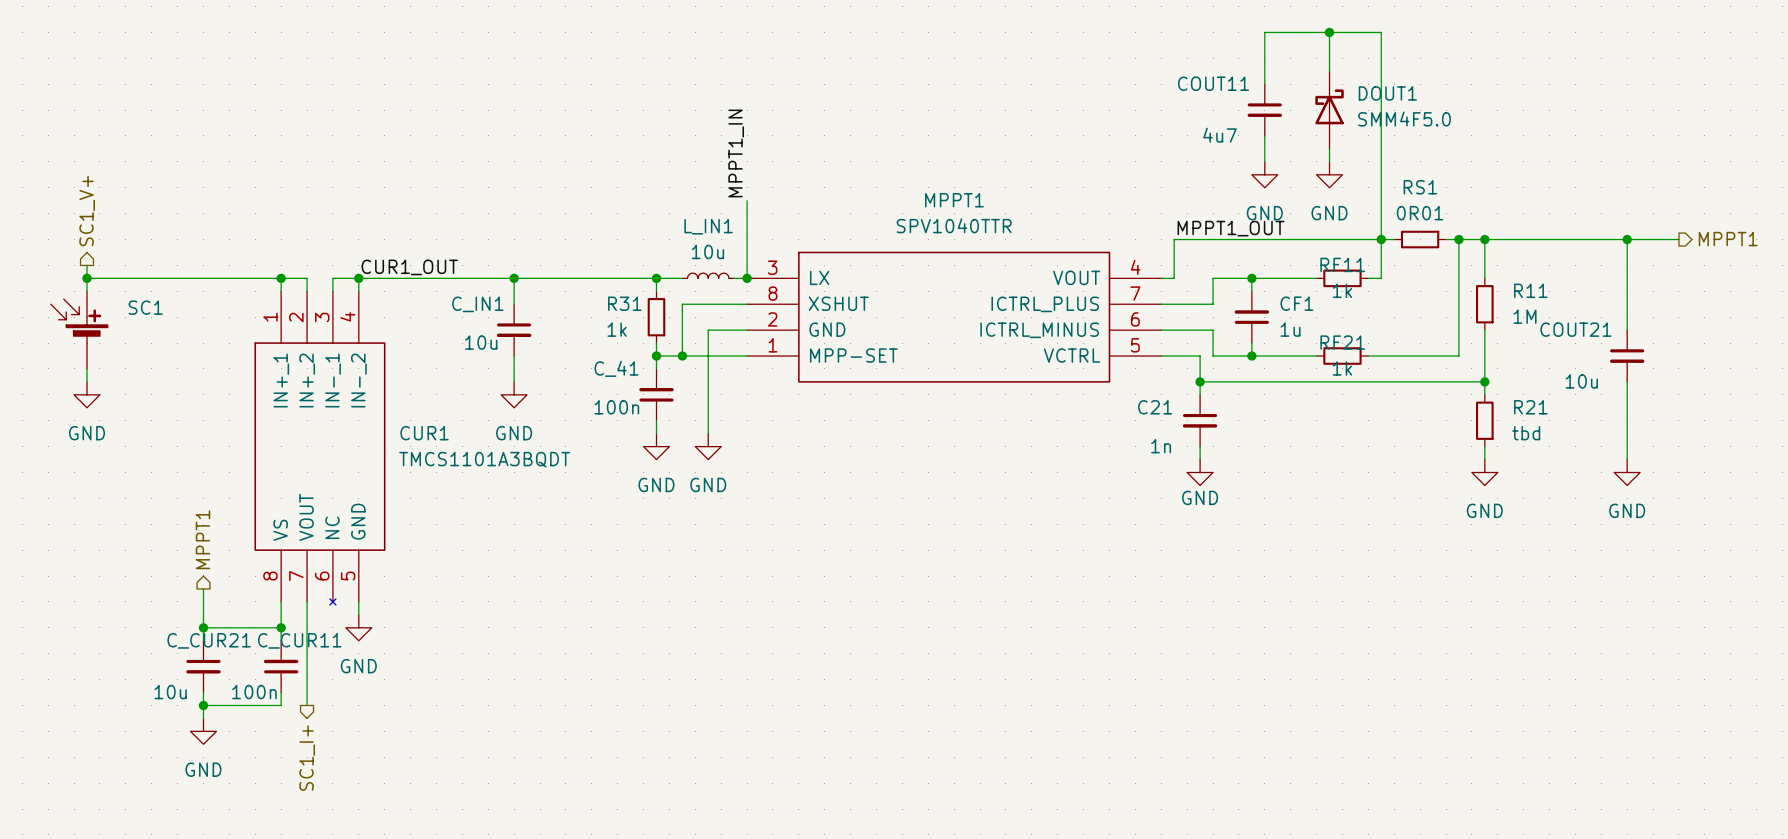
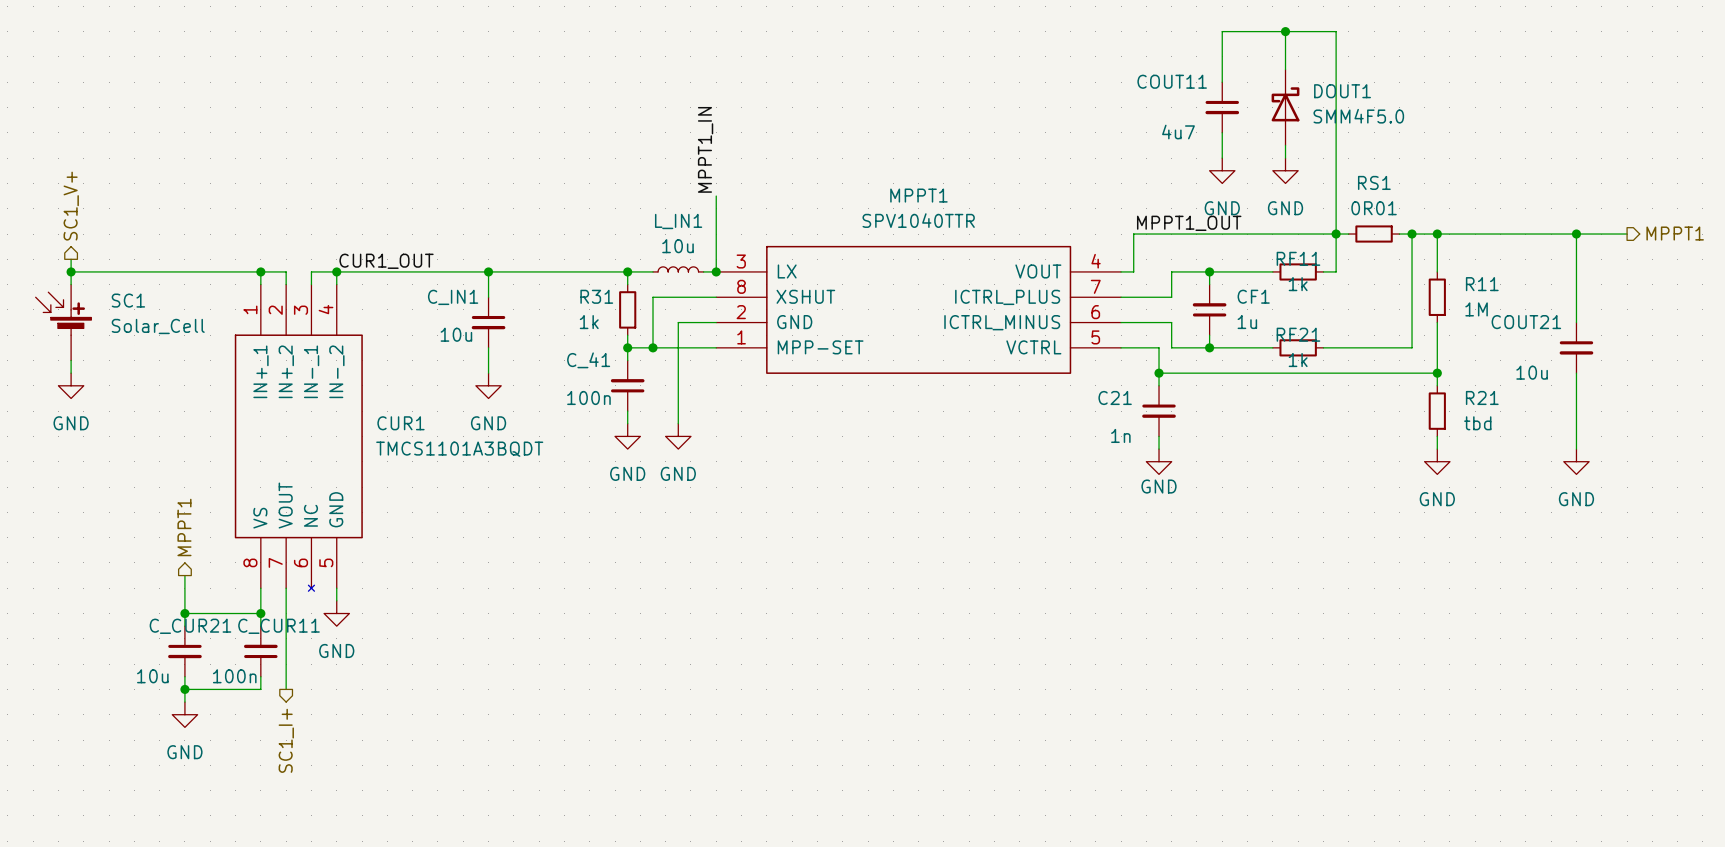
SC1 value: none -> Solar_Cell (158, 326)

